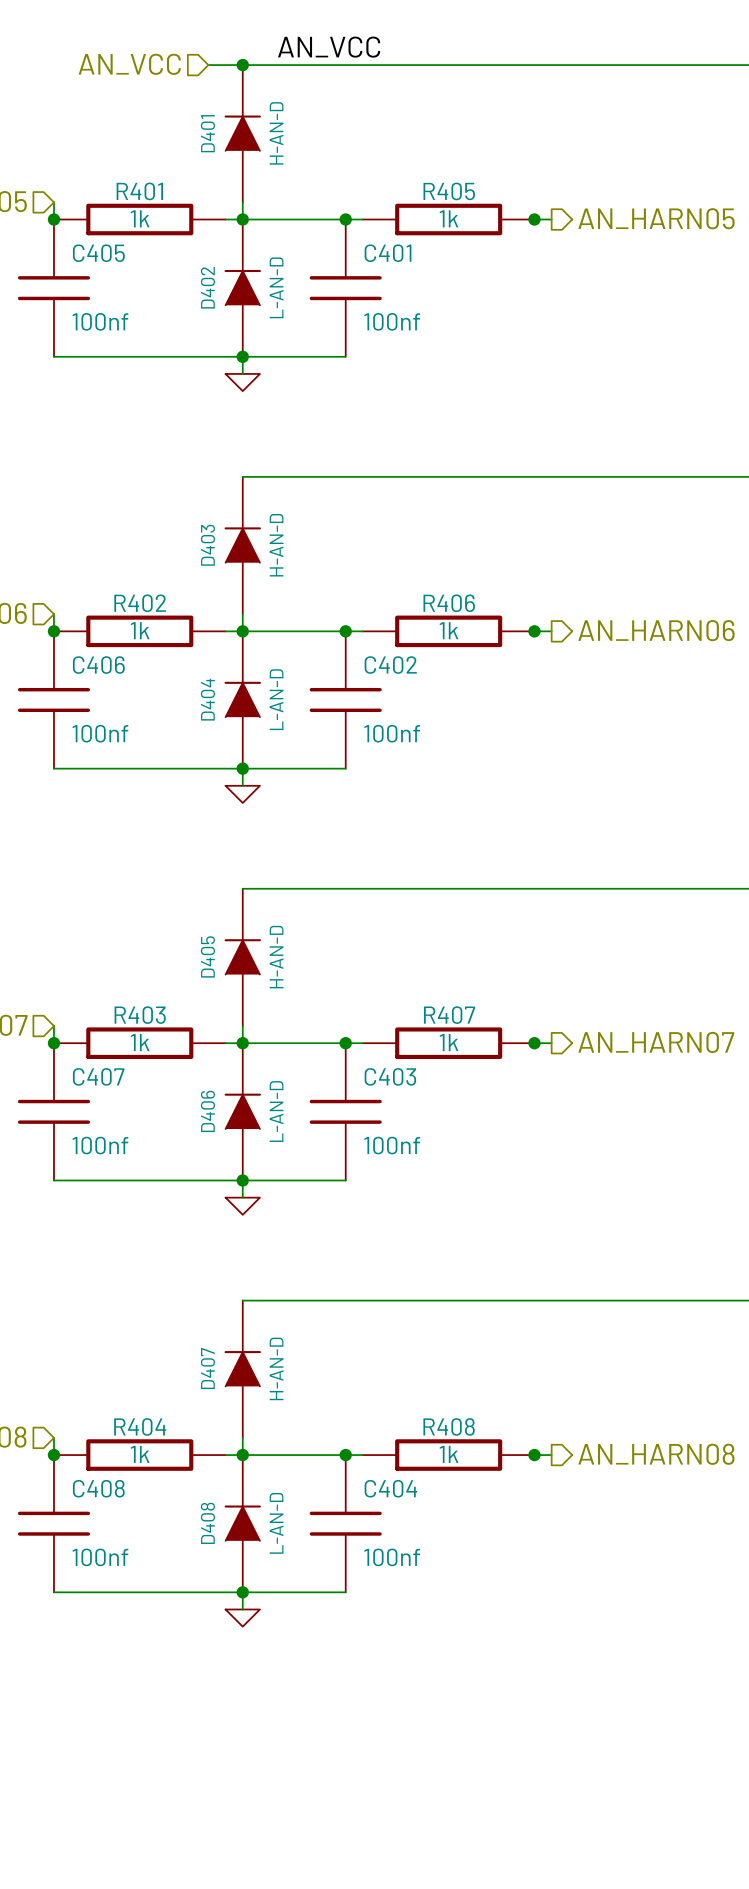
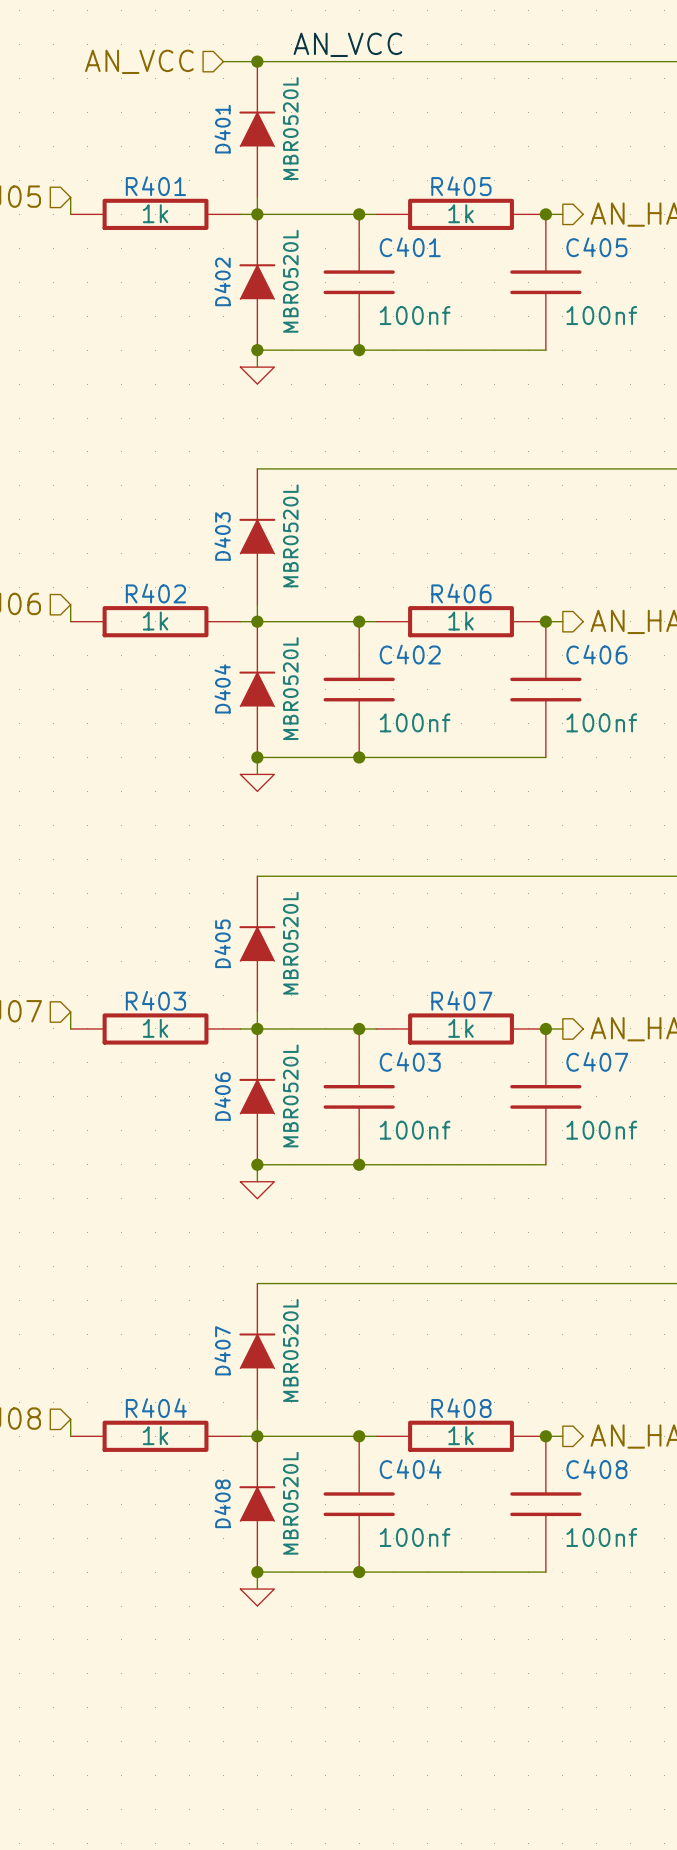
D401 value: H-AN-D (276, 133) -> MBR0520L (290, 128)
junction: (53, 219) -> none
D402 value: L-AN-D (276, 287) -> MBR0520L (290, 281)
C405 position: (53, 288) -> (545, 282)
wire: (53, 356) (242, 356) -> (359, 350) (545, 350)
junction: none -> (359, 350)
D403 value: H-AN-D (276, 545) -> MBR0520L (290, 535)
junction: (53, 631) -> none
D404 value: L-AN-D (276, 699) -> MBR0520L (290, 688)
C406 position: (53, 700) -> (545, 689)
wire: (53, 768) (242, 768) -> (359, 757) (545, 757)
junction: none -> (359, 757)
D405 value: H-AN-D (276, 957) -> MBR0520L (290, 943)
junction: (53, 1043) -> none
C407 position: (53, 1111) -> (545, 1096)
D406 value: L-AN-D (276, 1111) -> MBR0520L (290, 1095)
wire: (53, 1180) (242, 1180) -> (359, 1164) (545, 1164)
junction: none -> (359, 1164)
D407 value: H-AN-D (276, 1368) -> MBR0520L (290, 1350)
junction: (53, 1455) -> none
C408 position: (53, 1523) -> (545, 1504)
D408 value: L-AN-D (276, 1523) -> MBR0520L (290, 1503)
wire: (53, 1592) (242, 1592) -> (359, 1572) (545, 1572)
junction: none -> (359, 1572)

